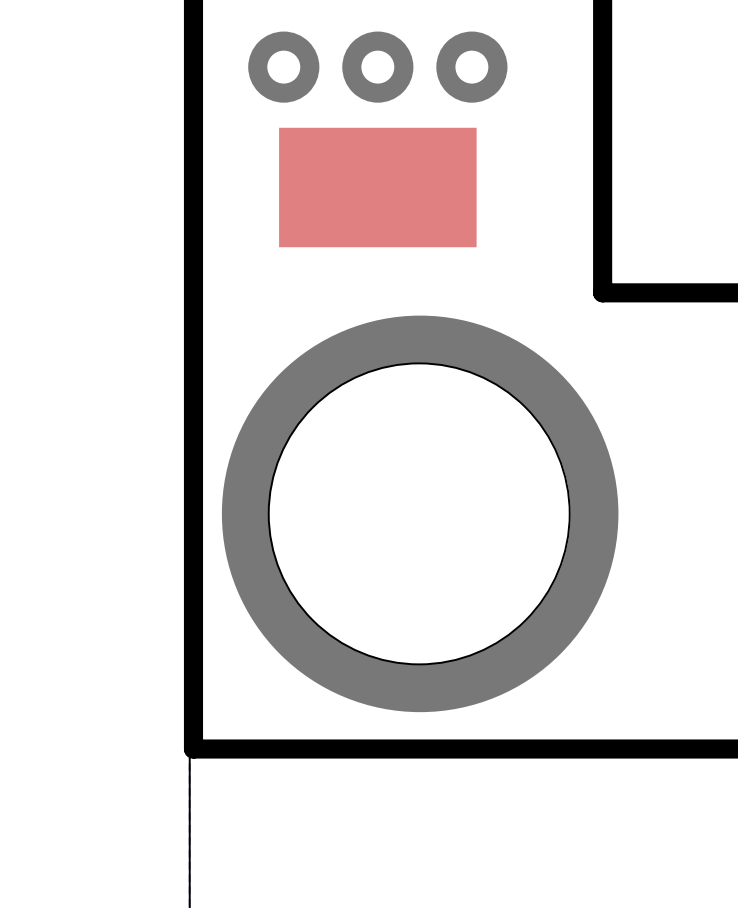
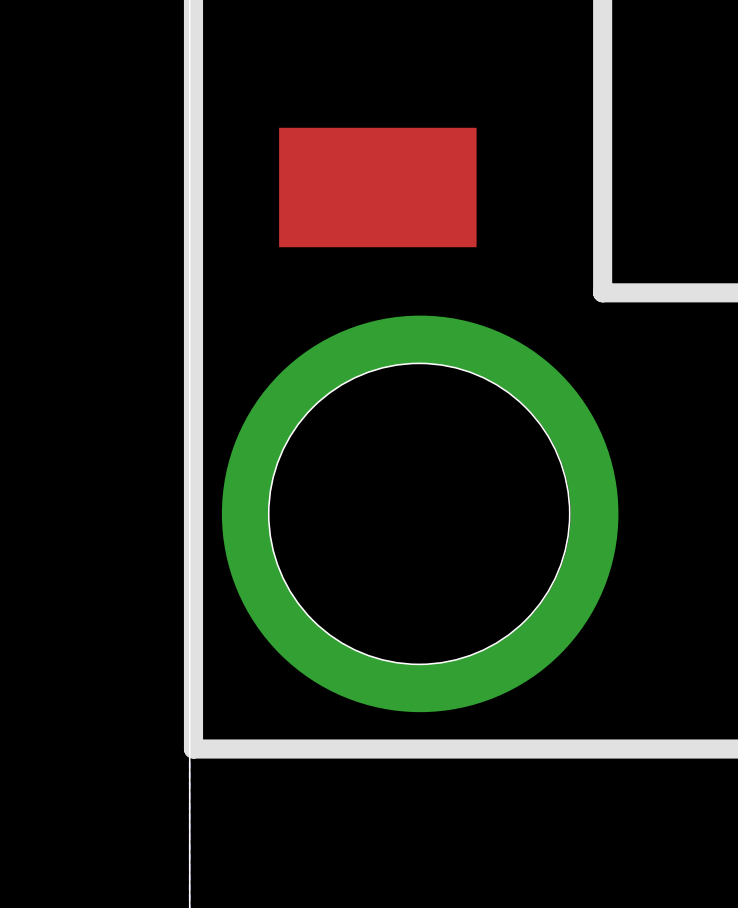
via: (283, 67) -> none
via: (377, 67) -> none
via: (471, 67) -> none

